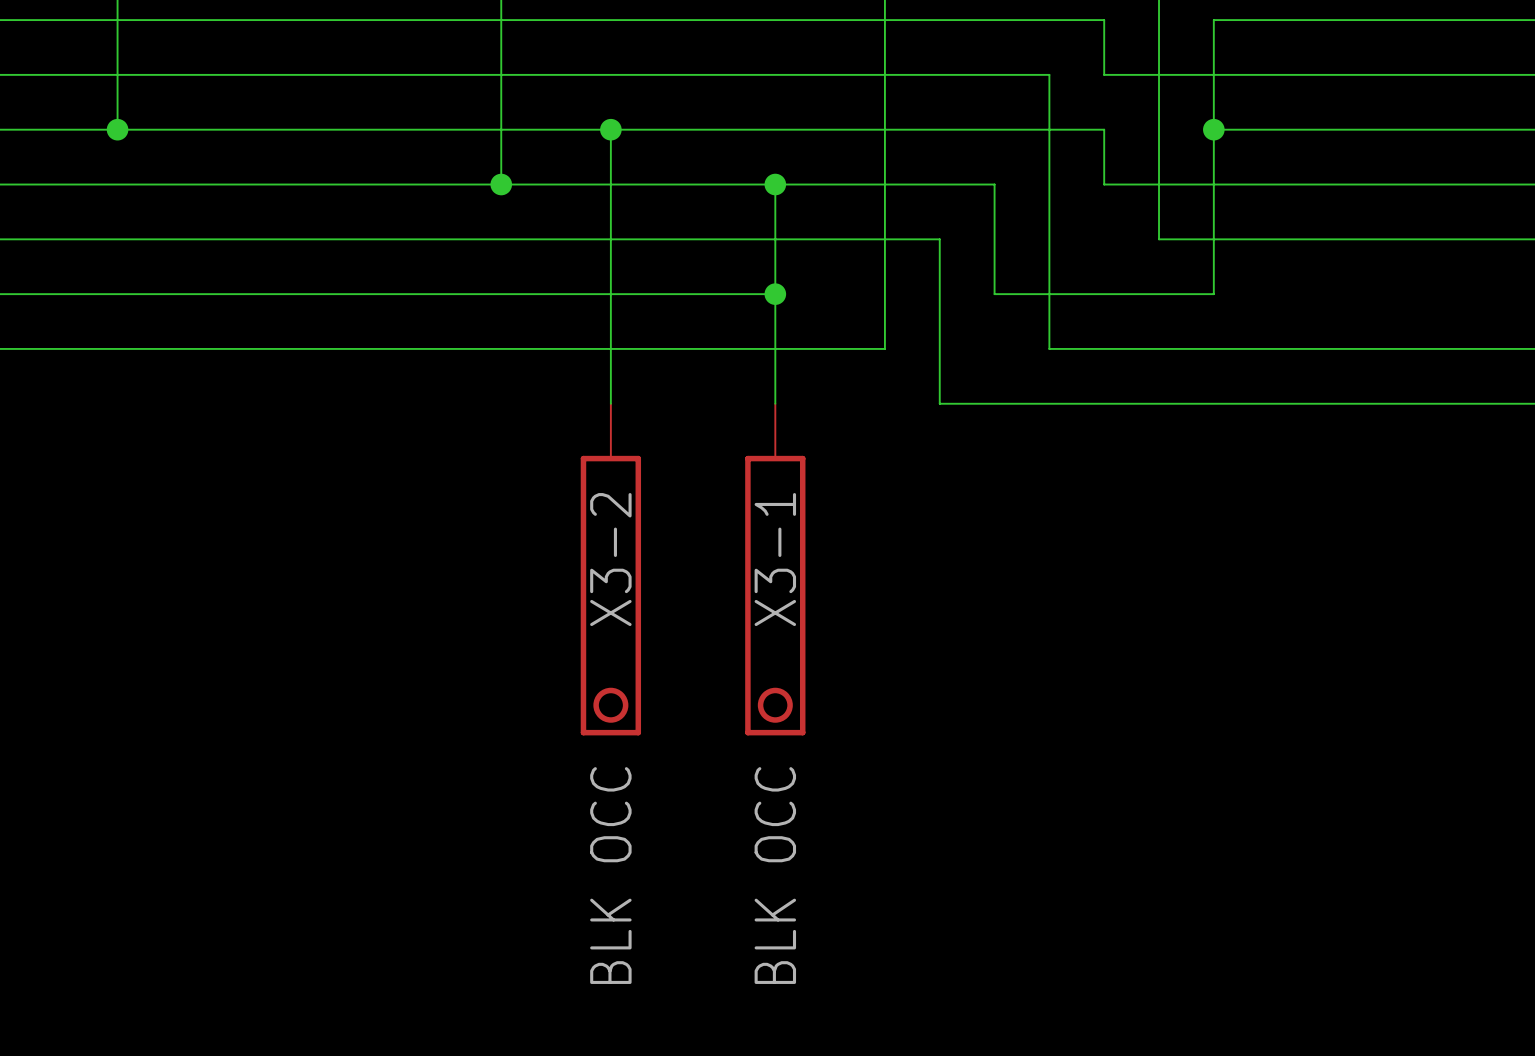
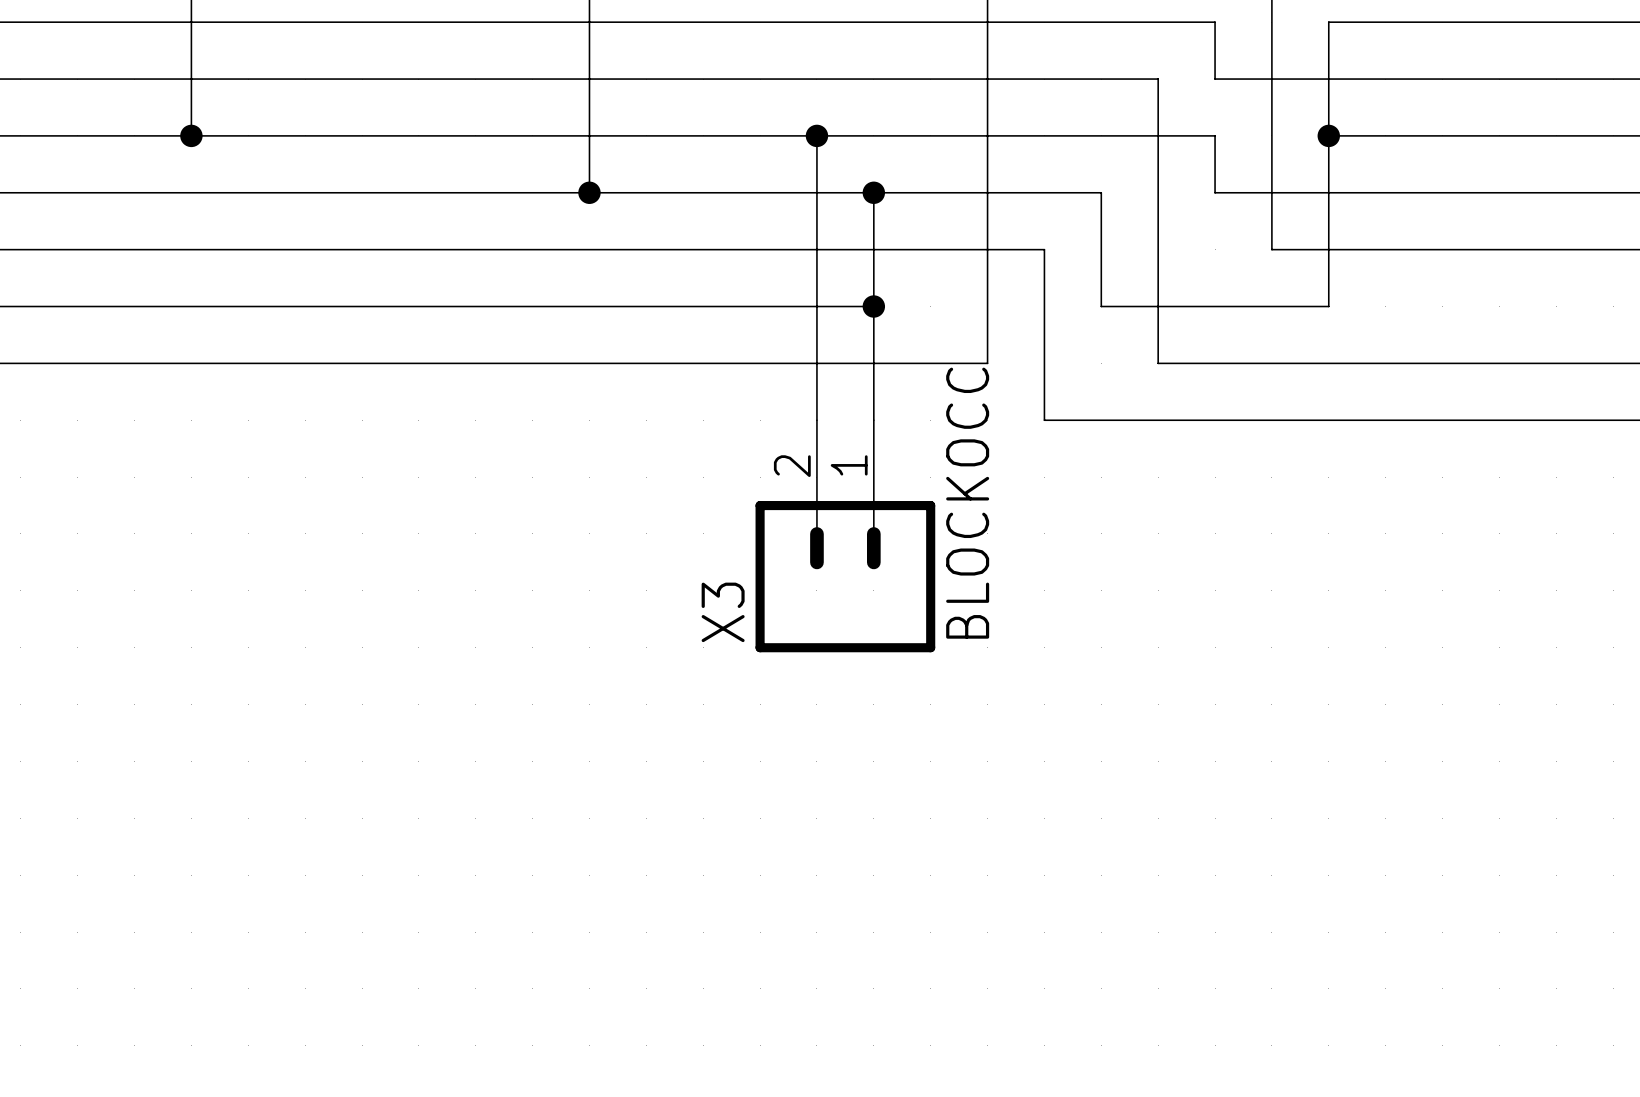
wire: (610, 129) (610, 403) -> (816, 135) (816, 420)
junction position: (610, 129) -> (816, 135)
X3: none -> BLOCKOCC (845, 536)
X3-2: BLK OCC (610, 569) -> none
X3-1: BLK OCC (775, 569) -> none

